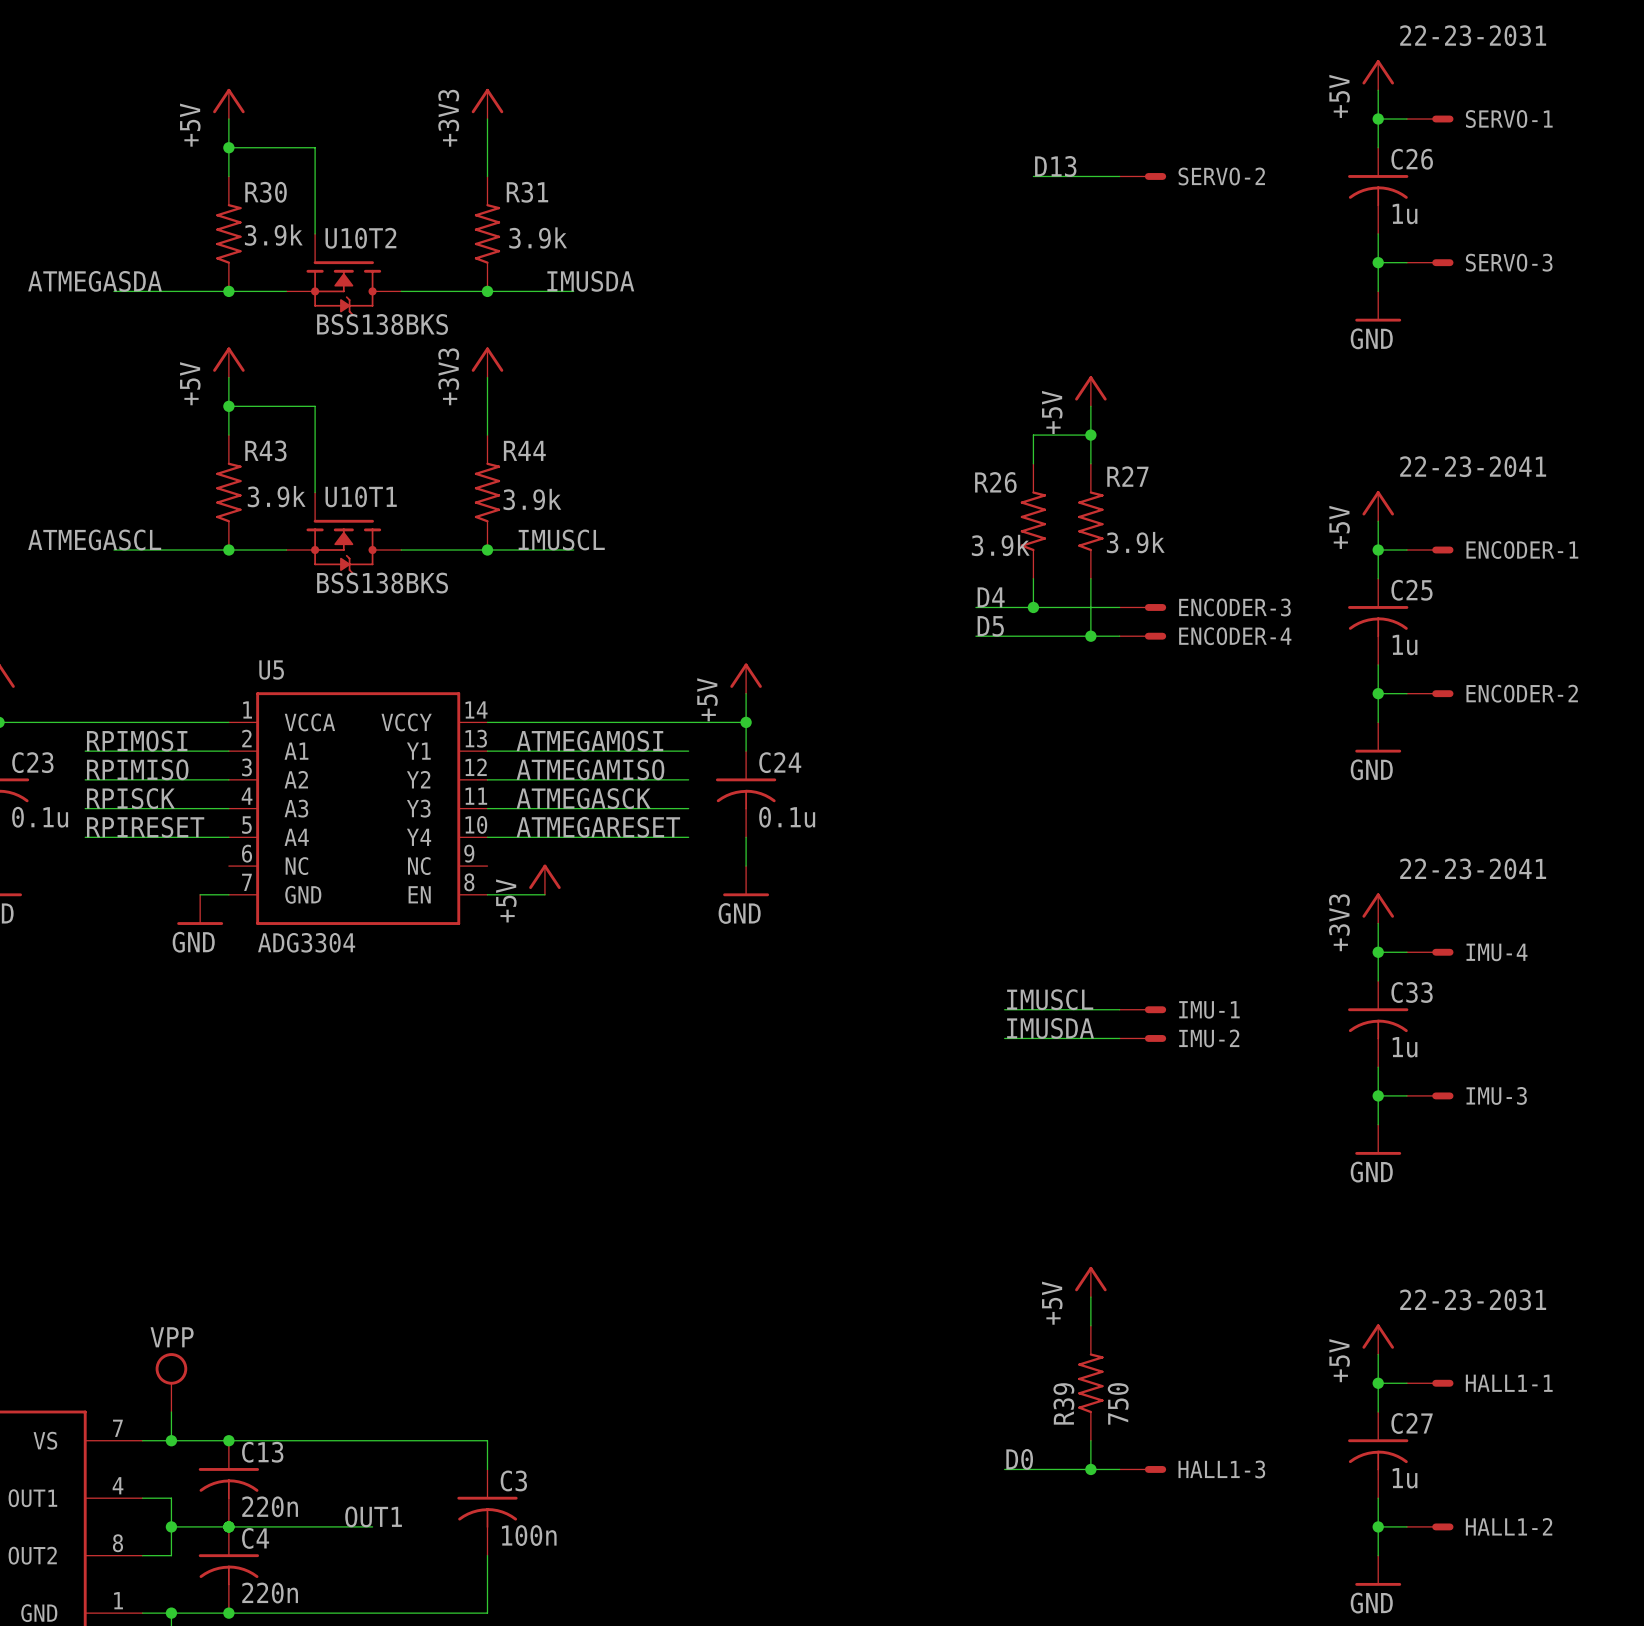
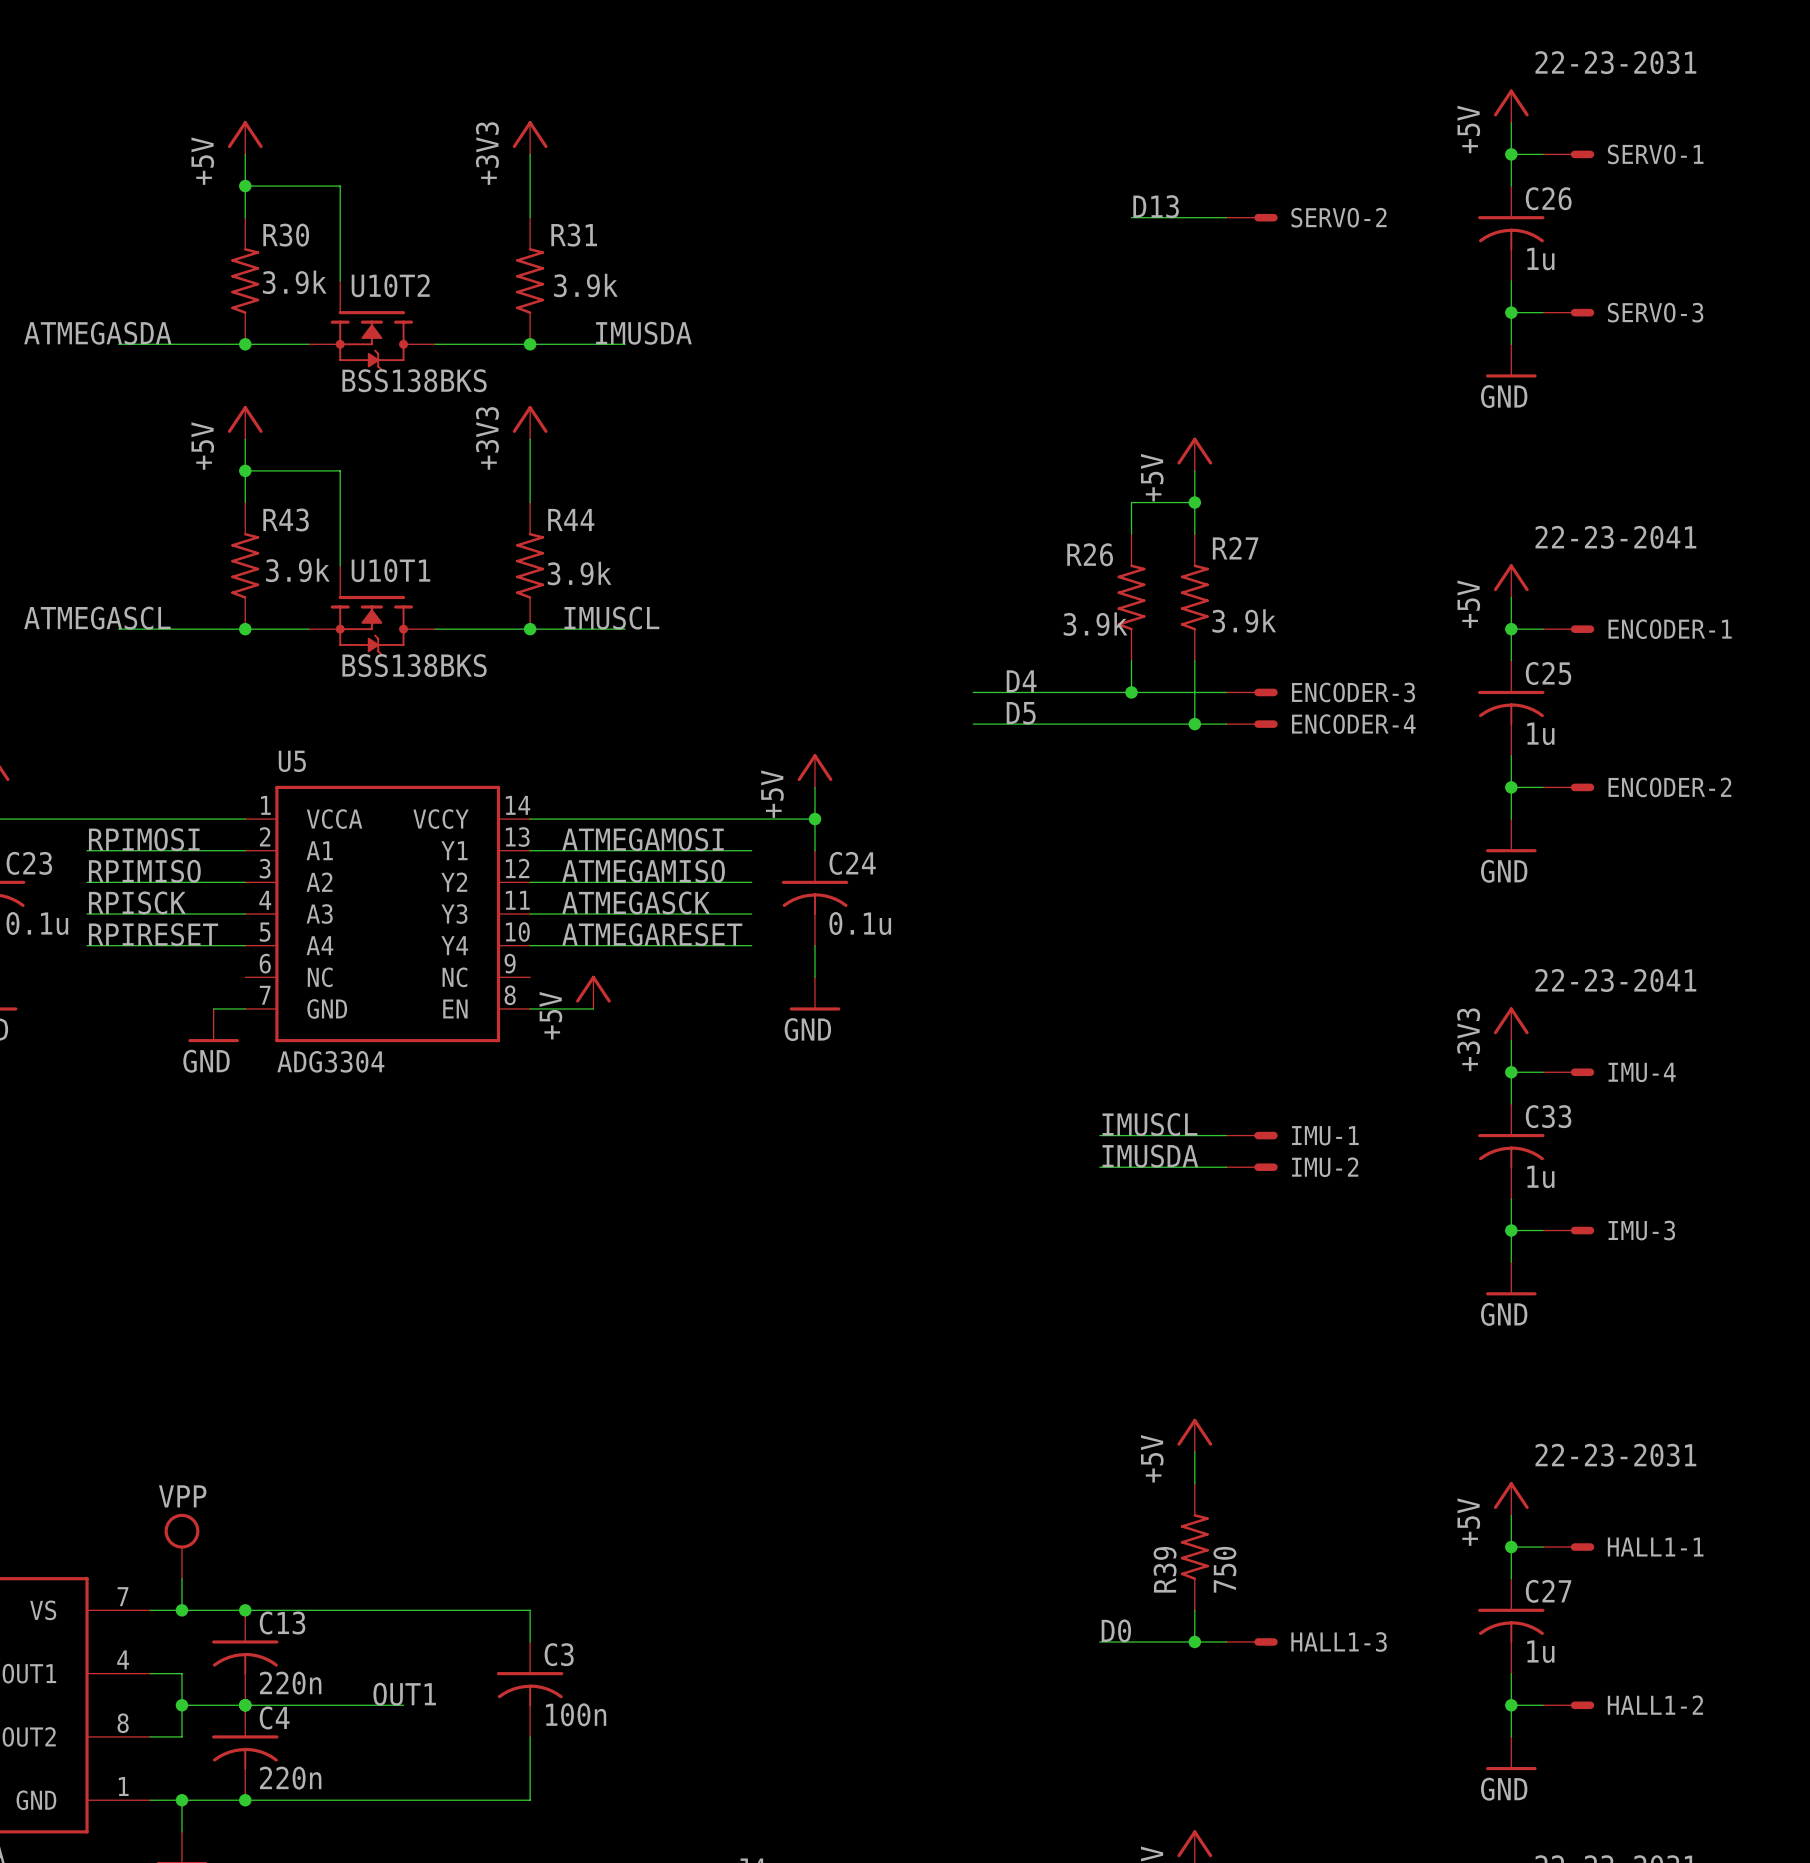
label position: D4 (991, 597) -> D4 (1021, 681)
wire: none -> (973, 692) (1068, 692)
label position: D5 (990, 626) -> D5 (1021, 713)
wire: none -> (973, 724) (1068, 724)

